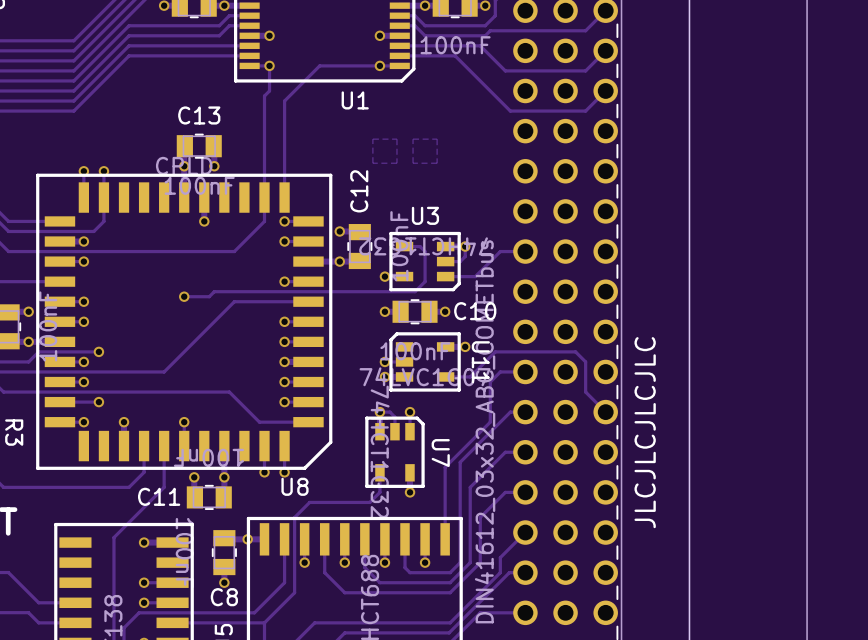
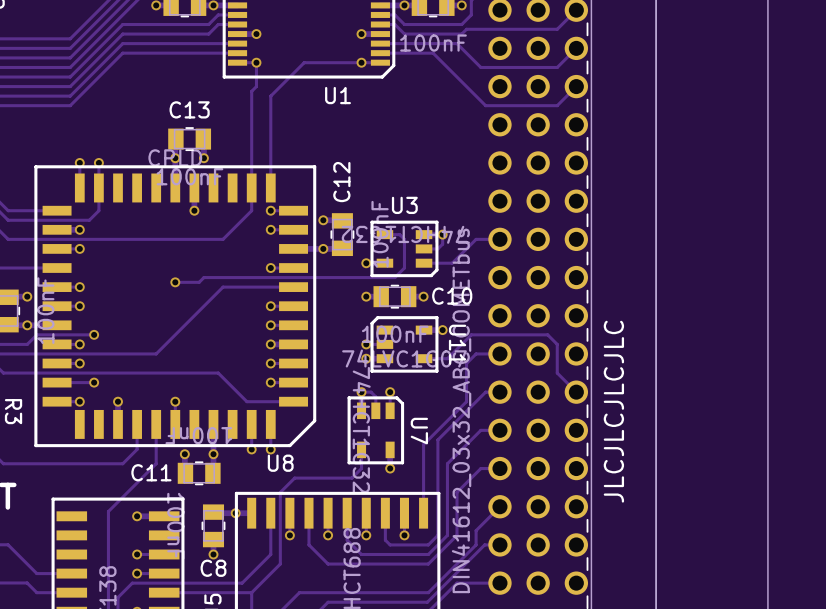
zone outline: (372, 139) (396, 139) (396, 163) (372, 163) (372, 139) -> none
zone outline: (413, 139) (437, 139) (437, 163) (413, 163) (413, 139) -> none

